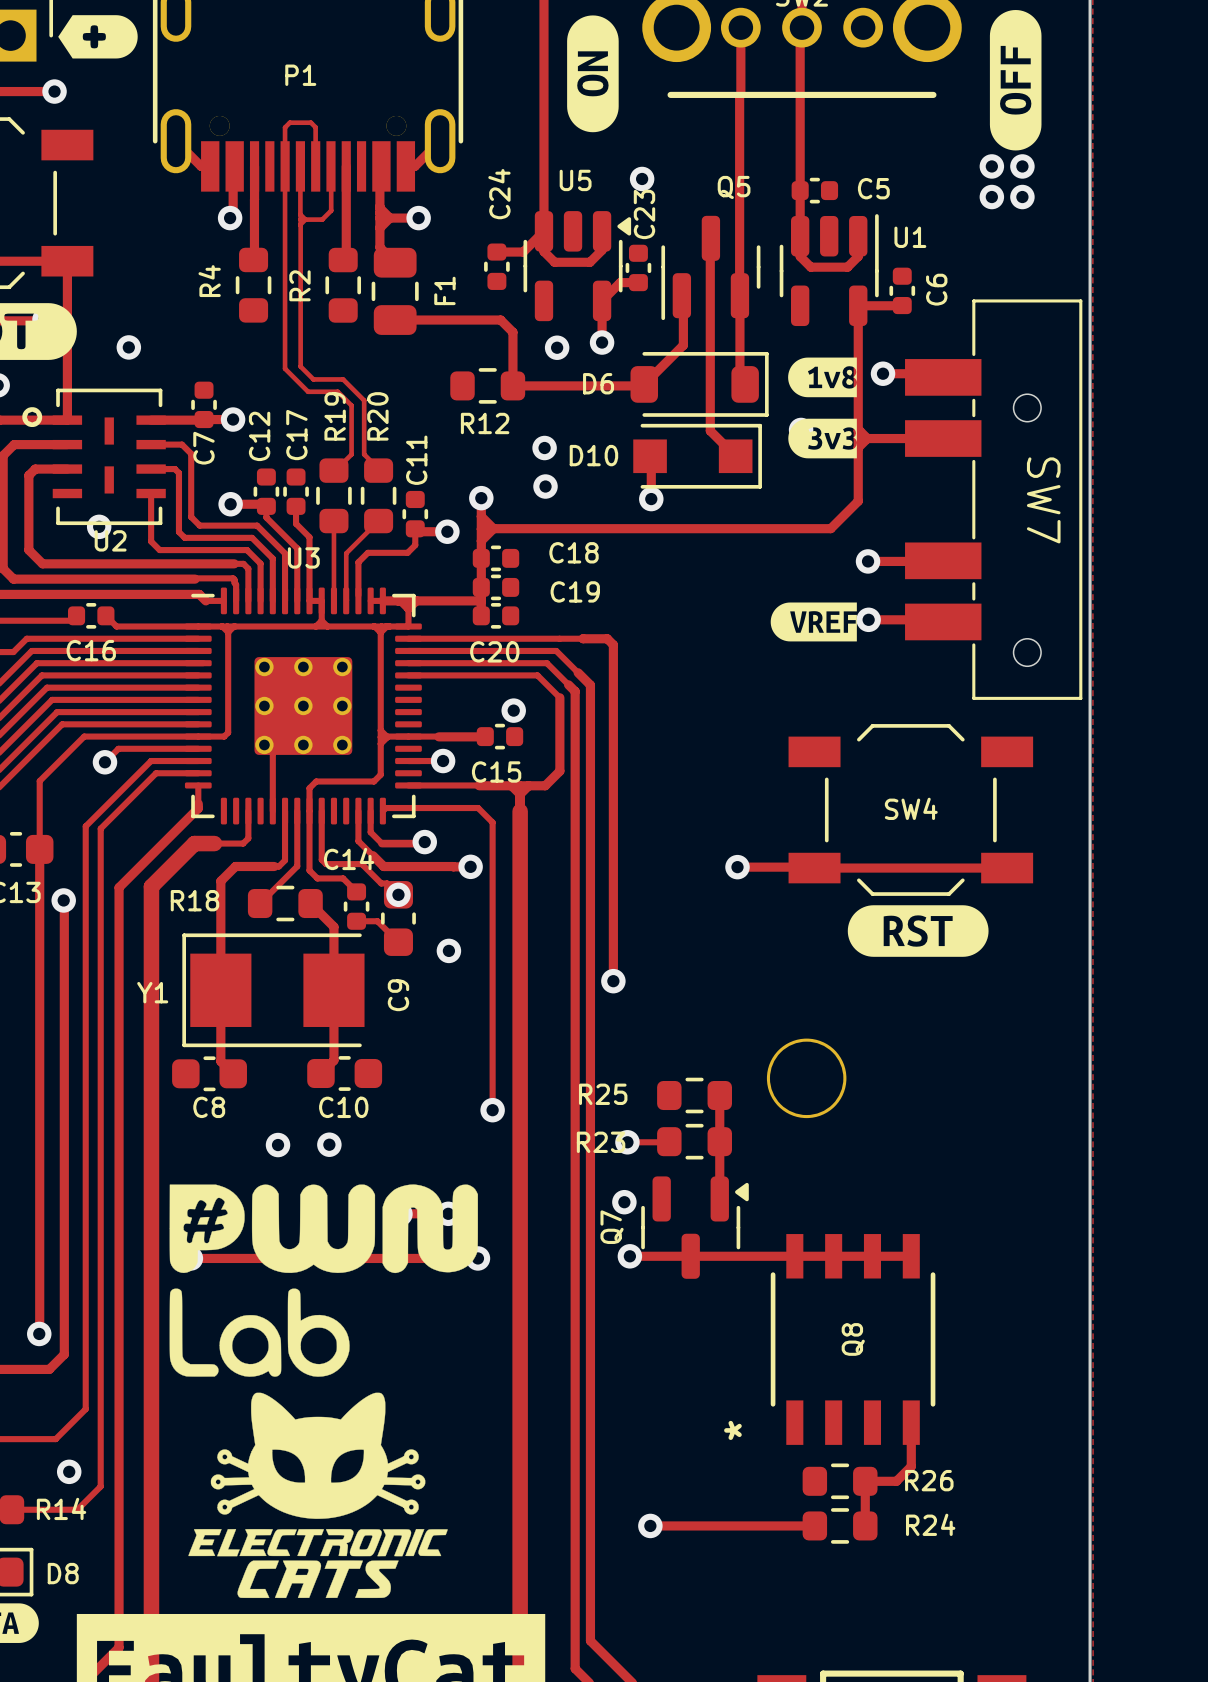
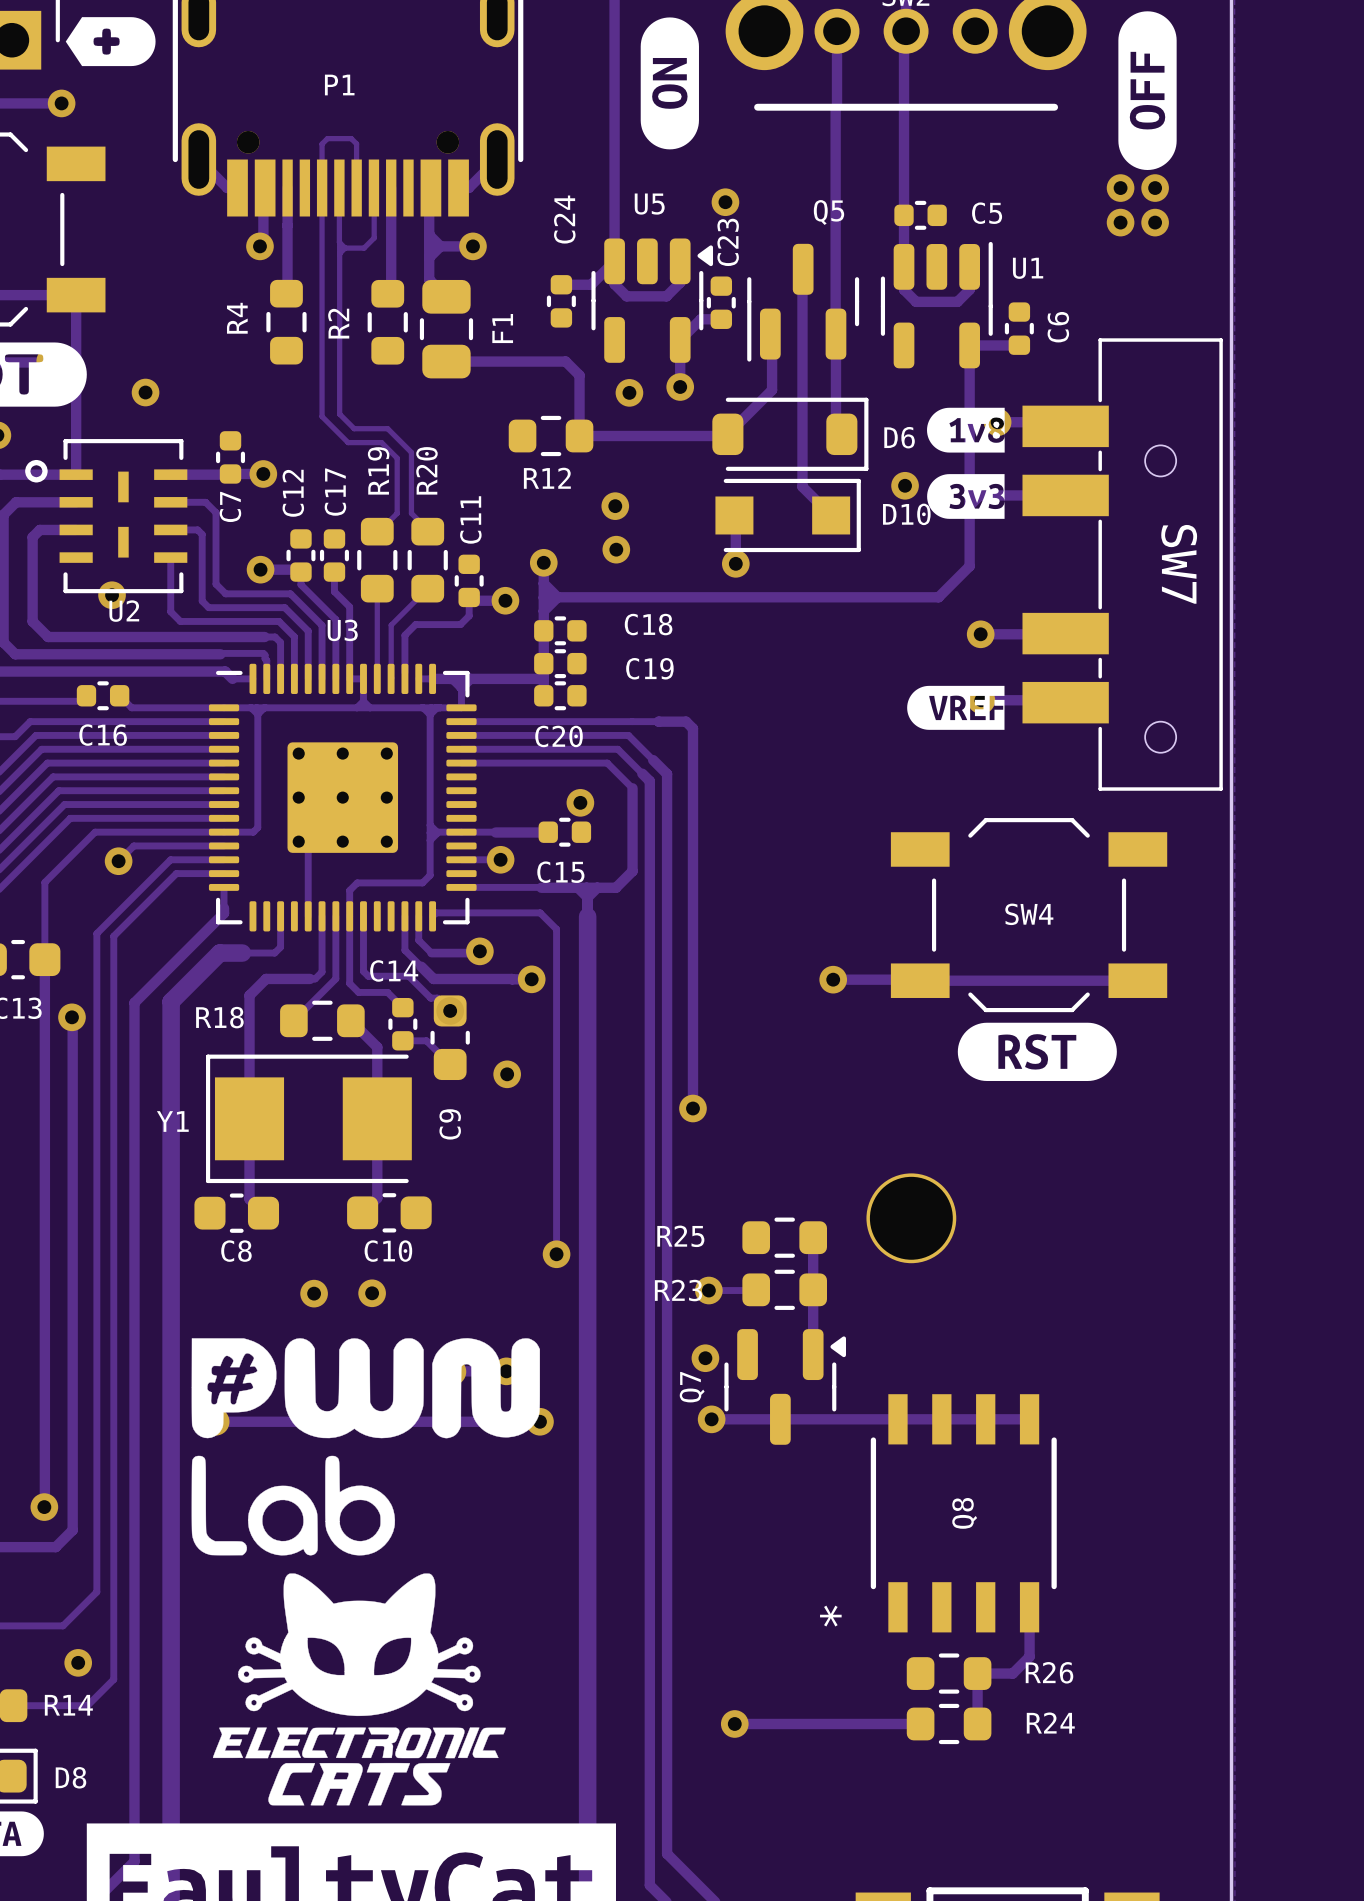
drawing position: (822, 377) -> (965, 430)
D6 name position: D6 (598, 383) -> D6 (899, 437)
drawing position: (822, 438) -> (965, 496)
D10 name position: D10 (593, 455) -> D10 (906, 514)
drawing position: (813, 621) -> (955, 707)

